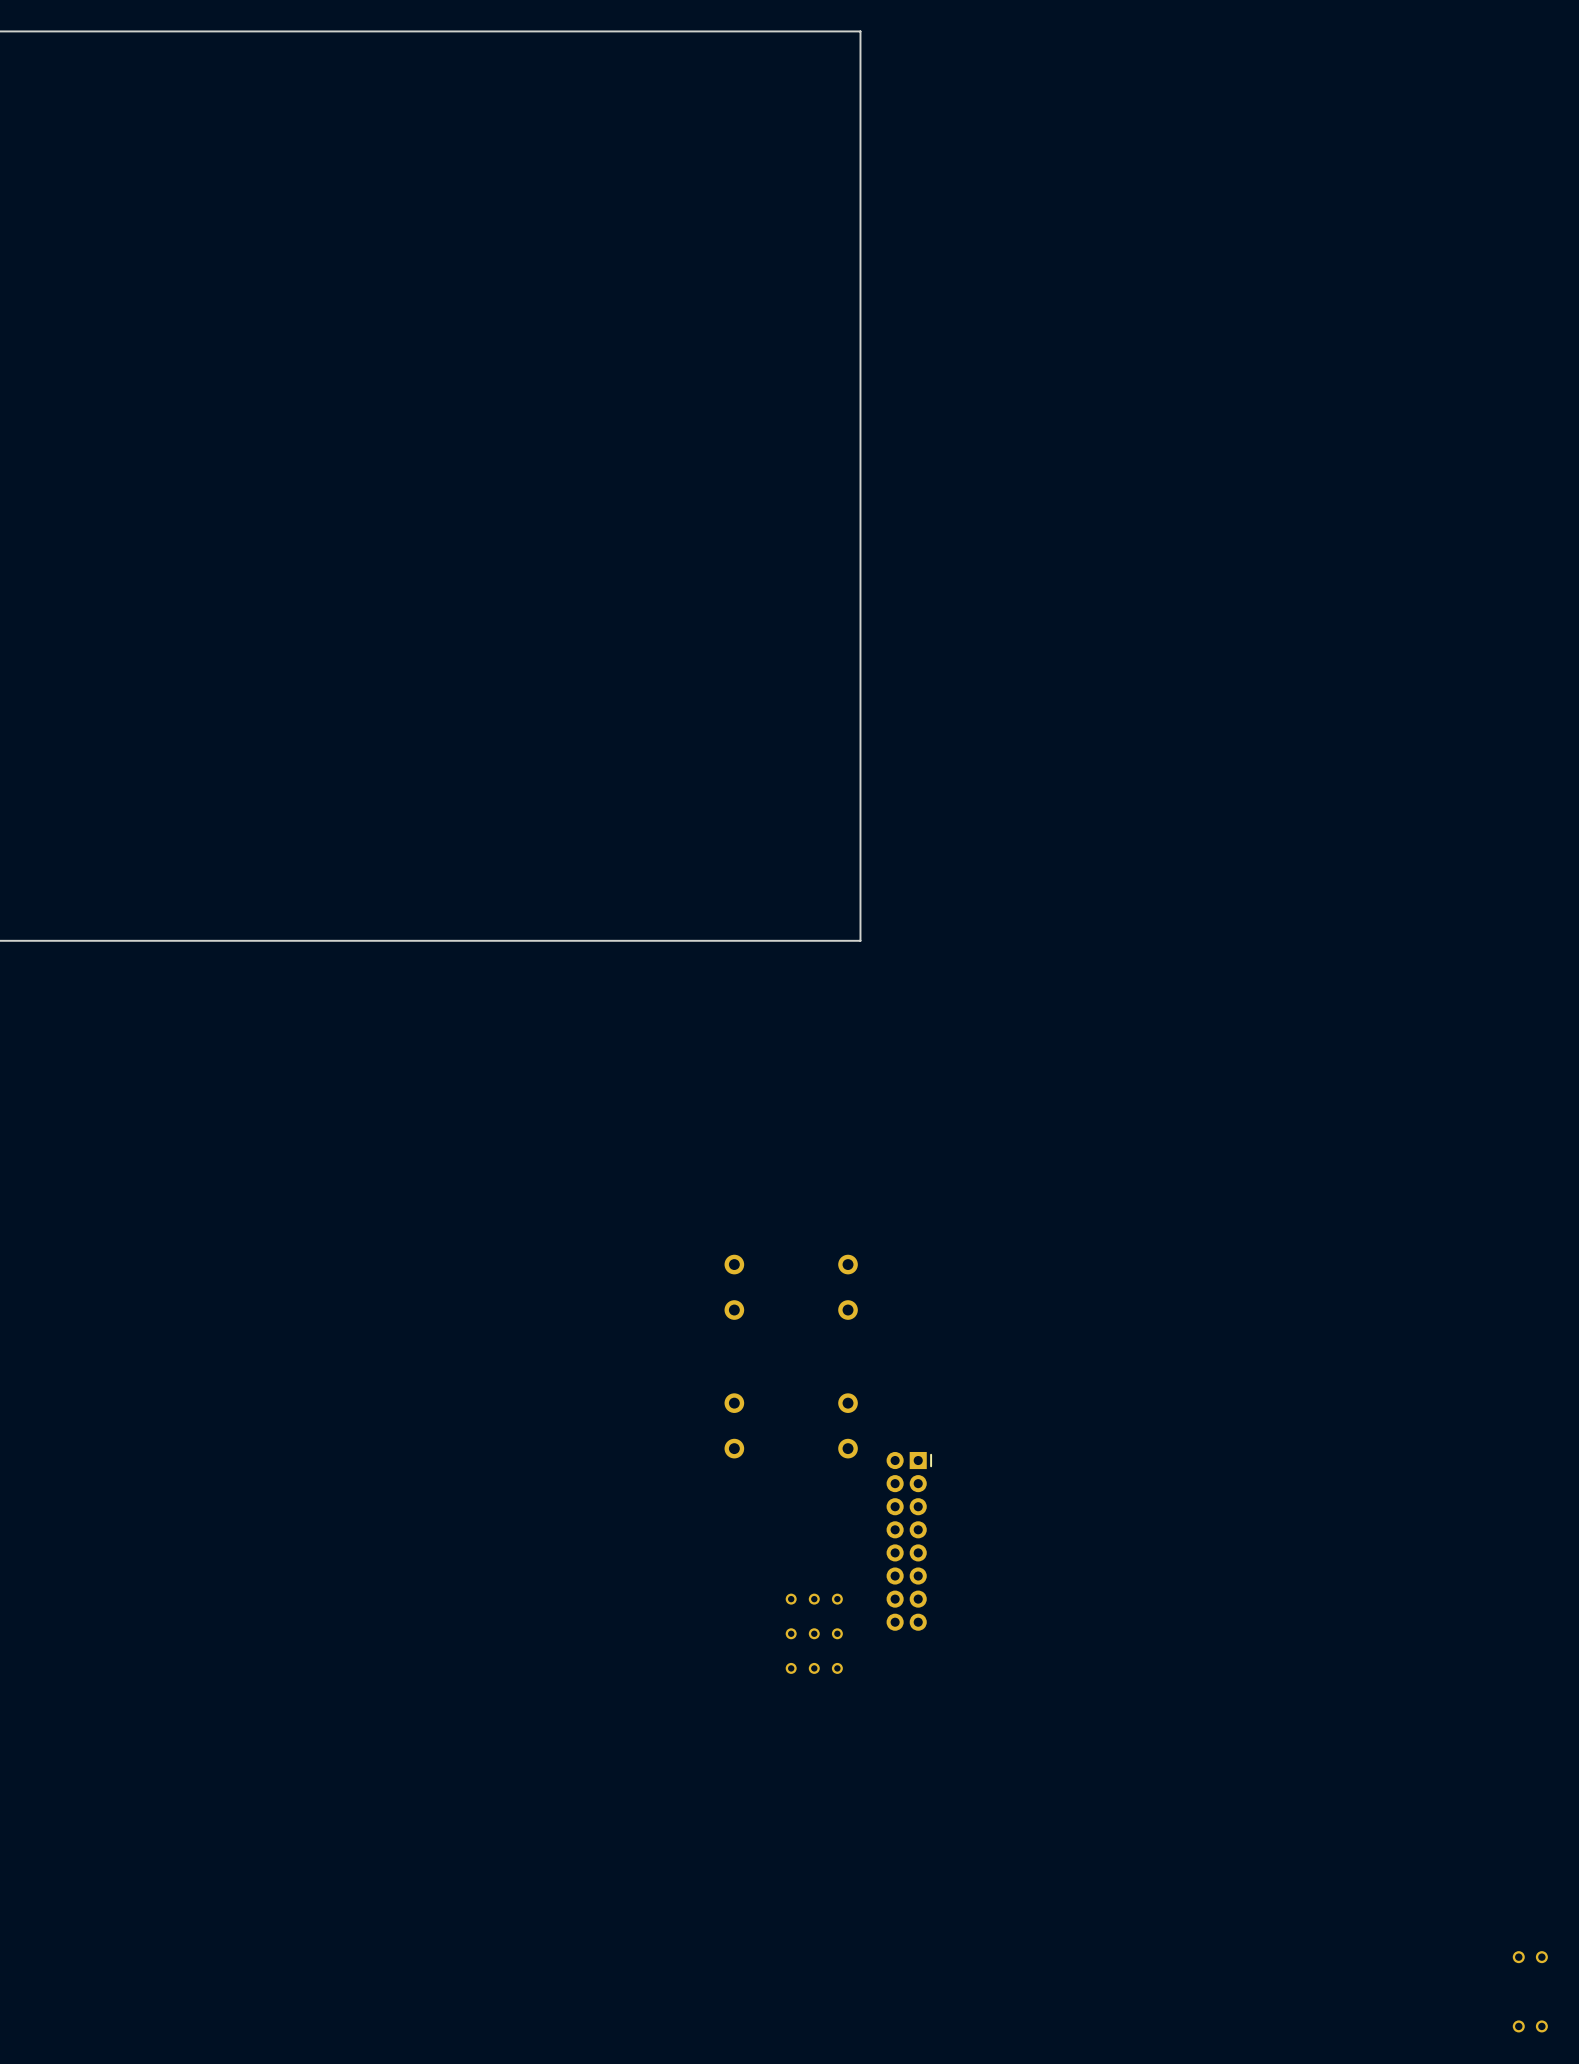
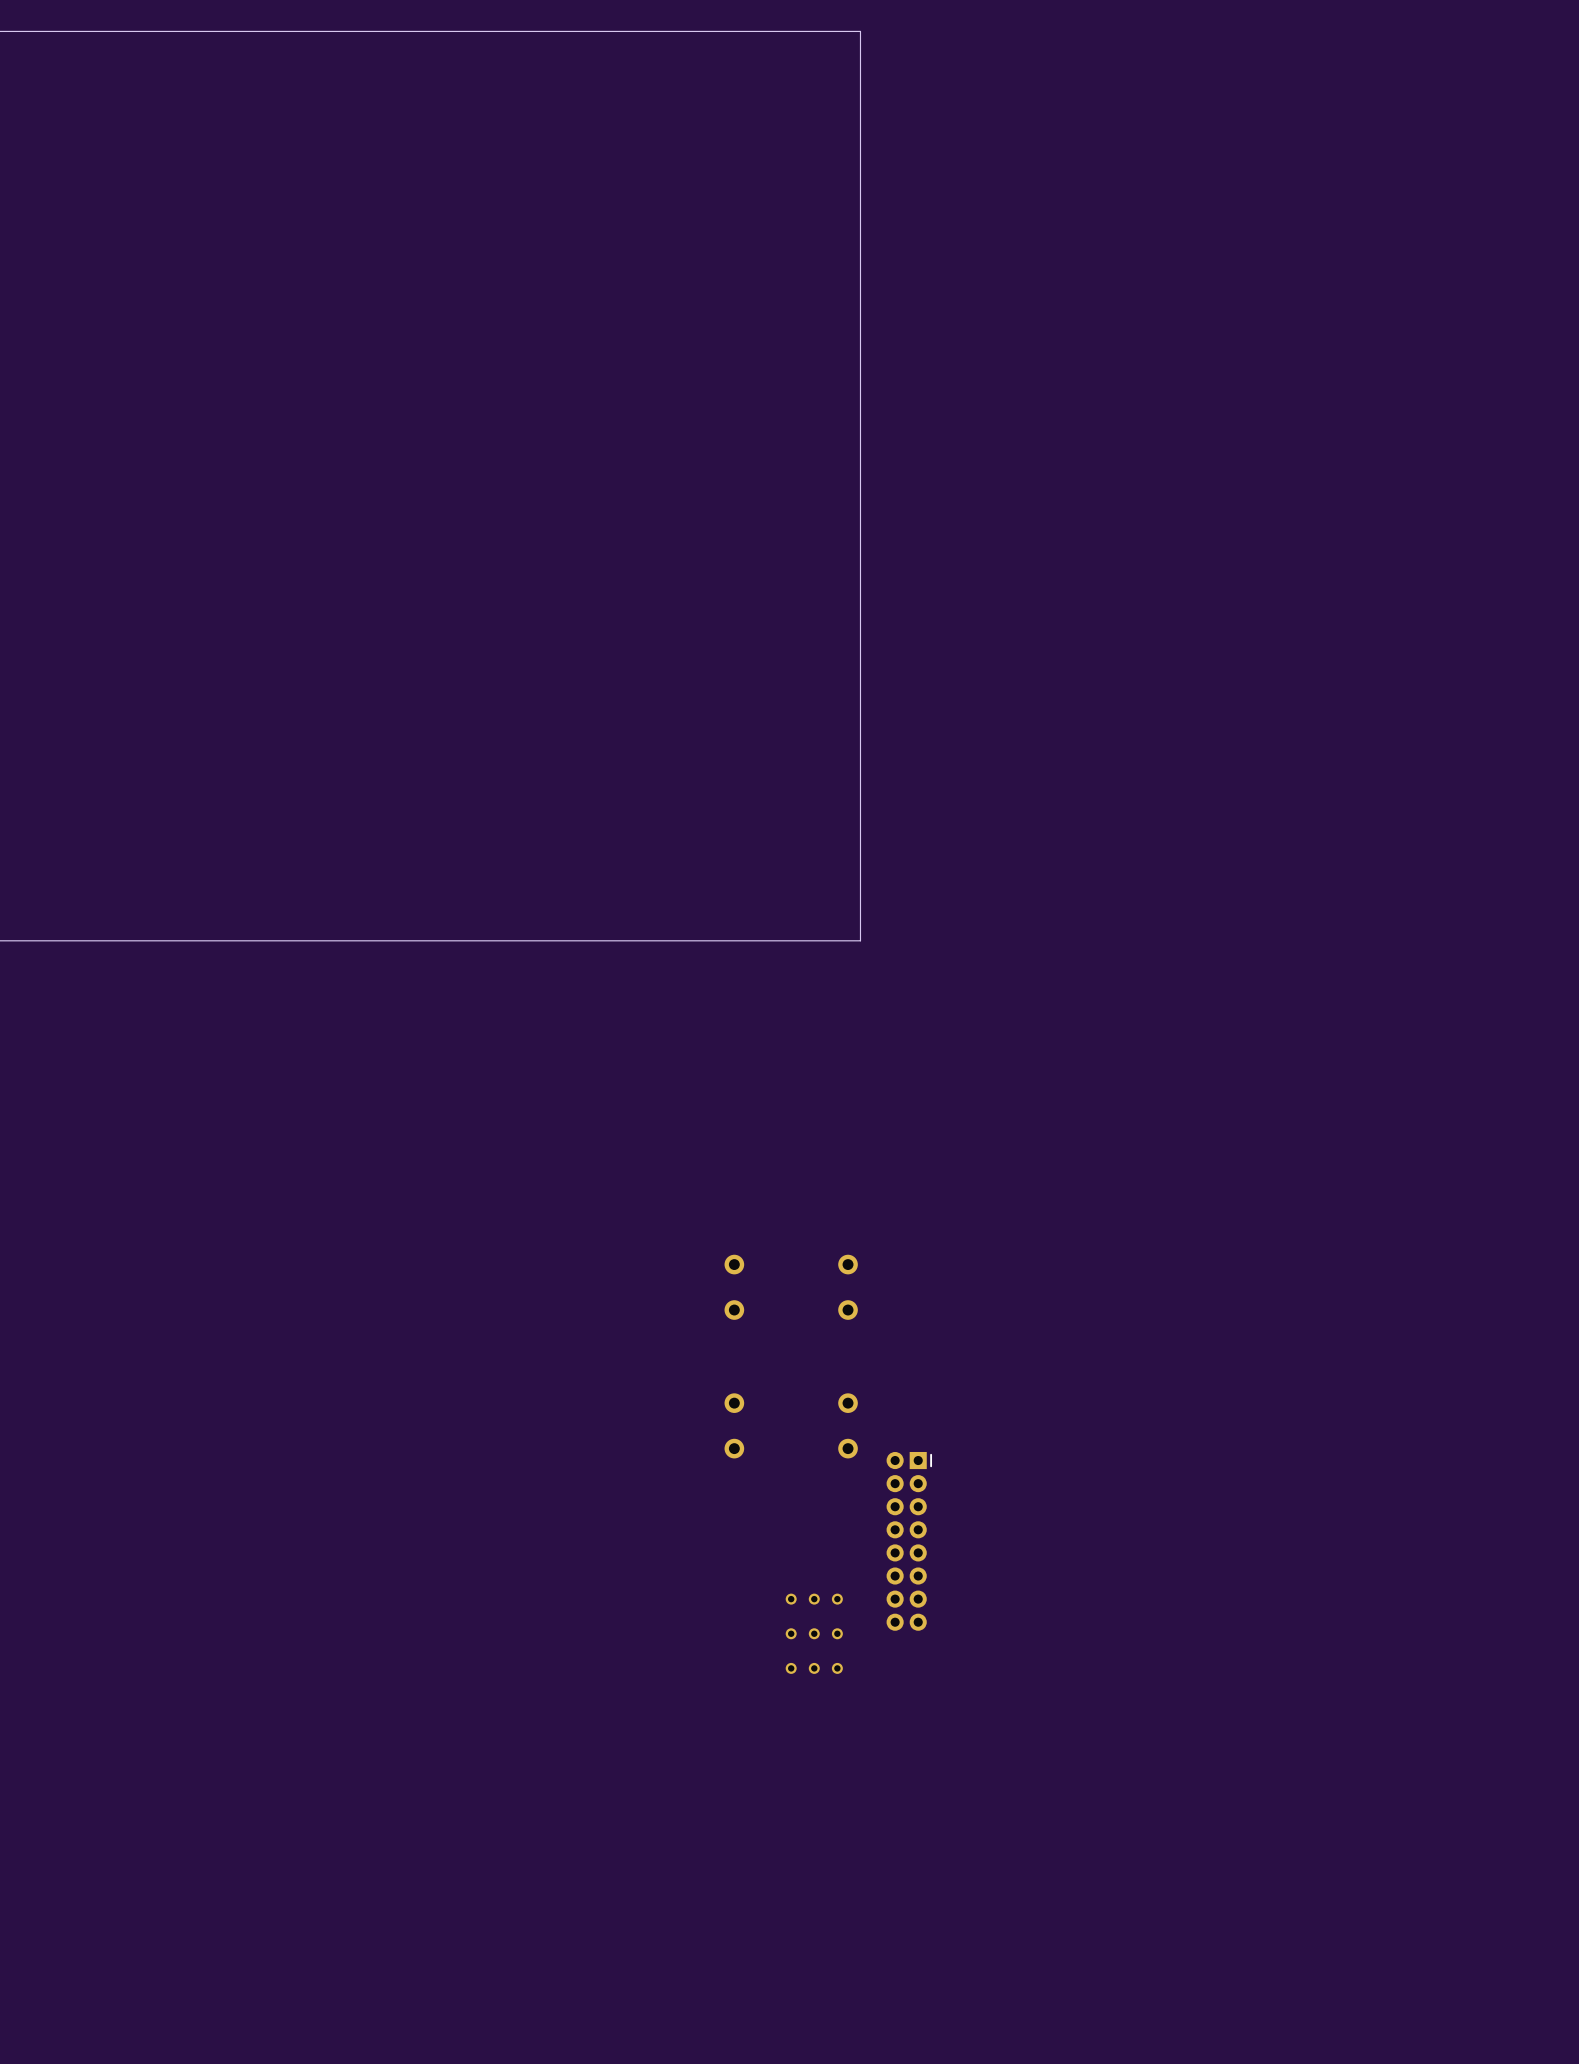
part: (1530, 1957) -> none
part: (1530, 2026) -> none

